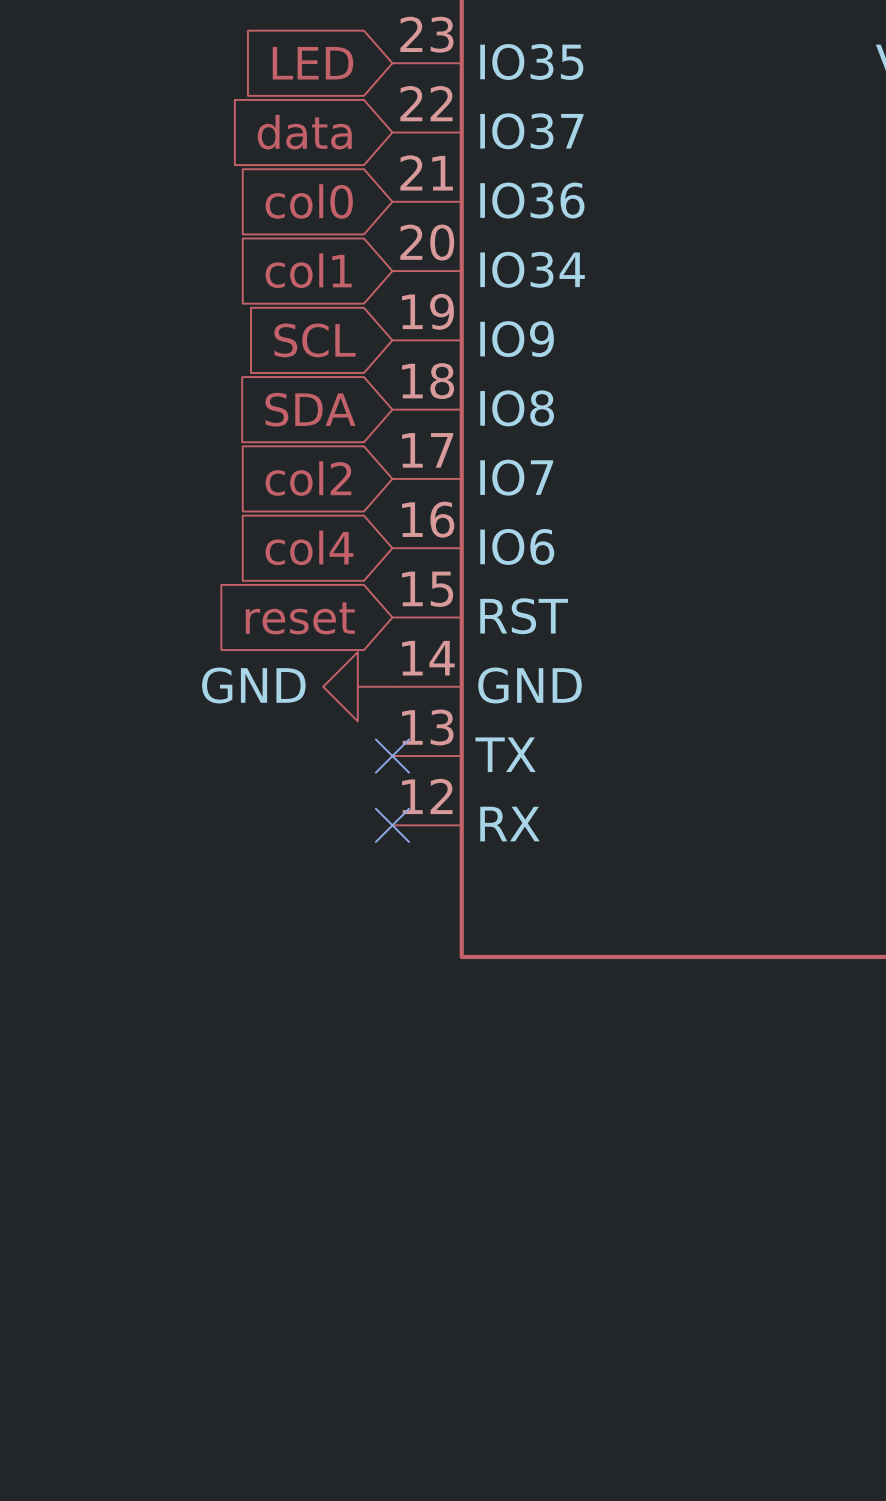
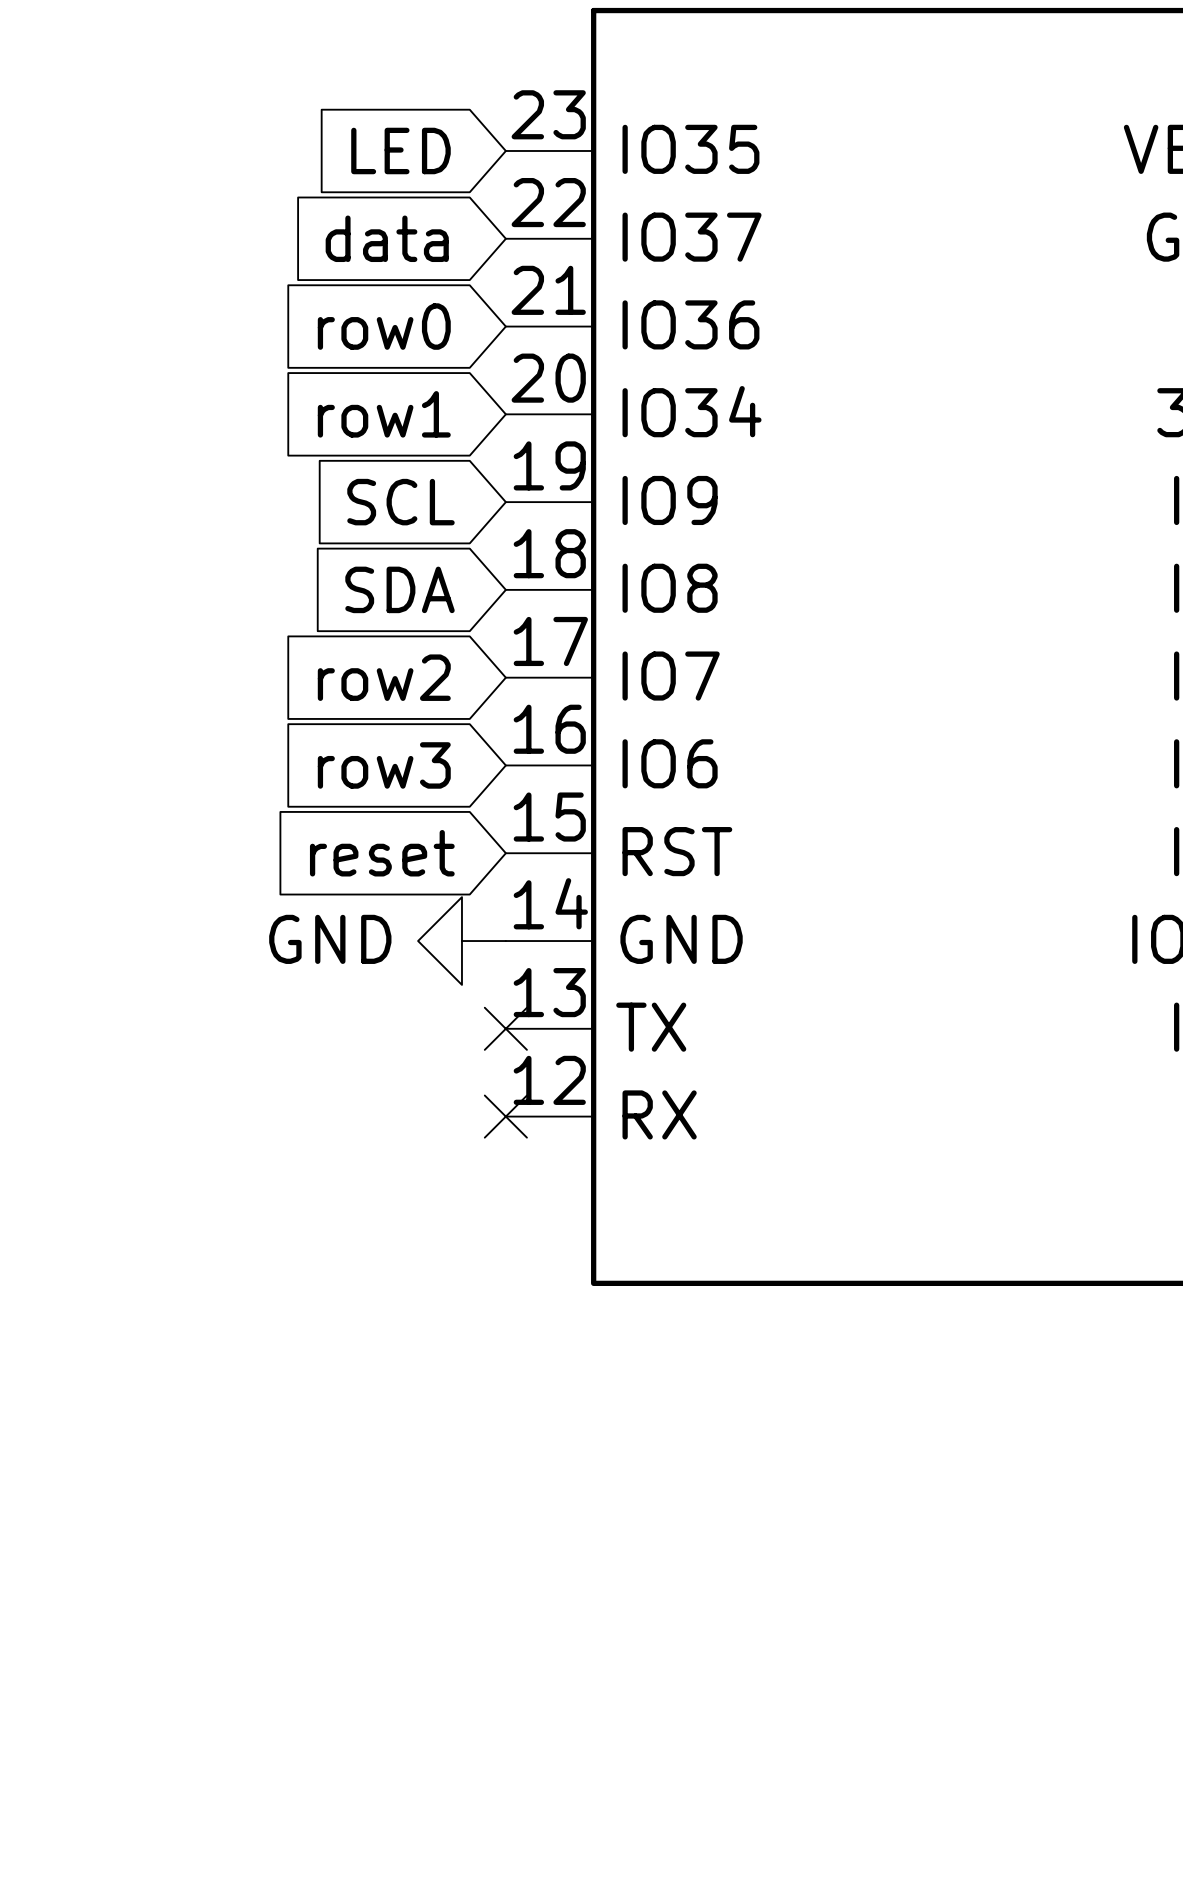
global label: col0 (309, 201) -> row0 (384, 326)
global label: col1 (308, 270) -> row1 (384, 414)
global label: col2 (308, 478) -> row2 (384, 677)
global label: col4 (309, 547) -> row3 (384, 765)

